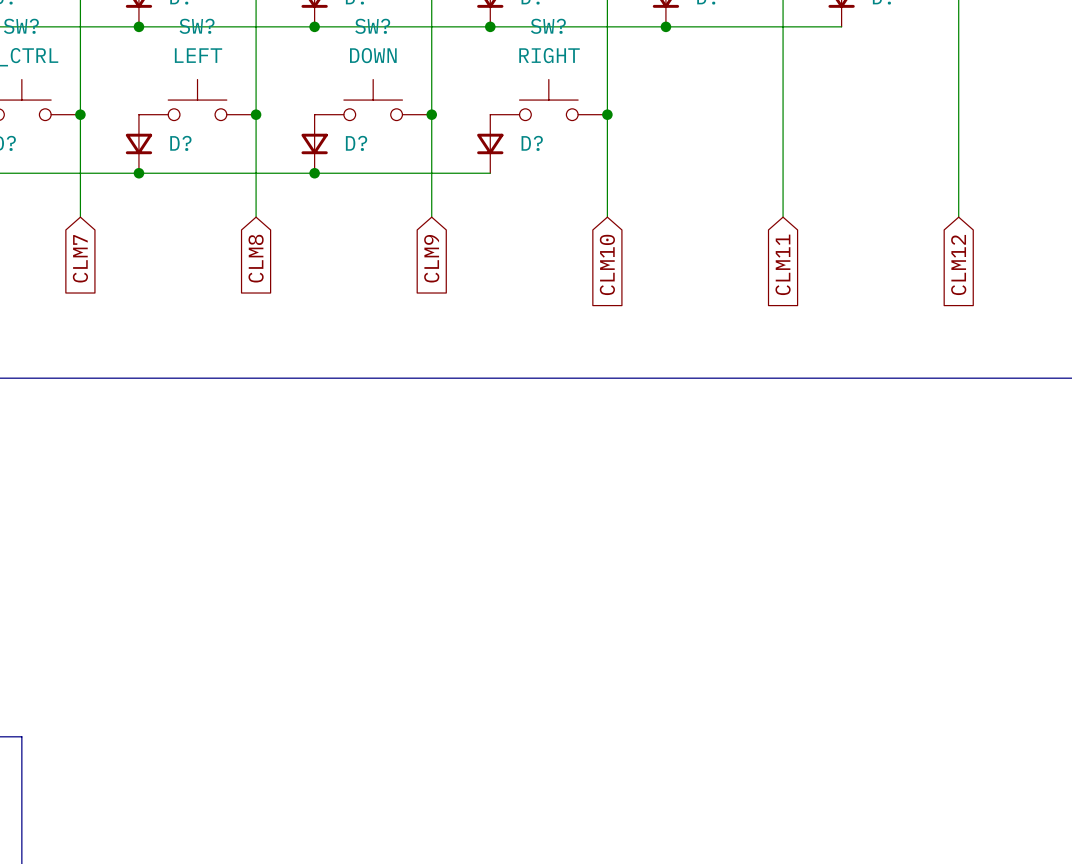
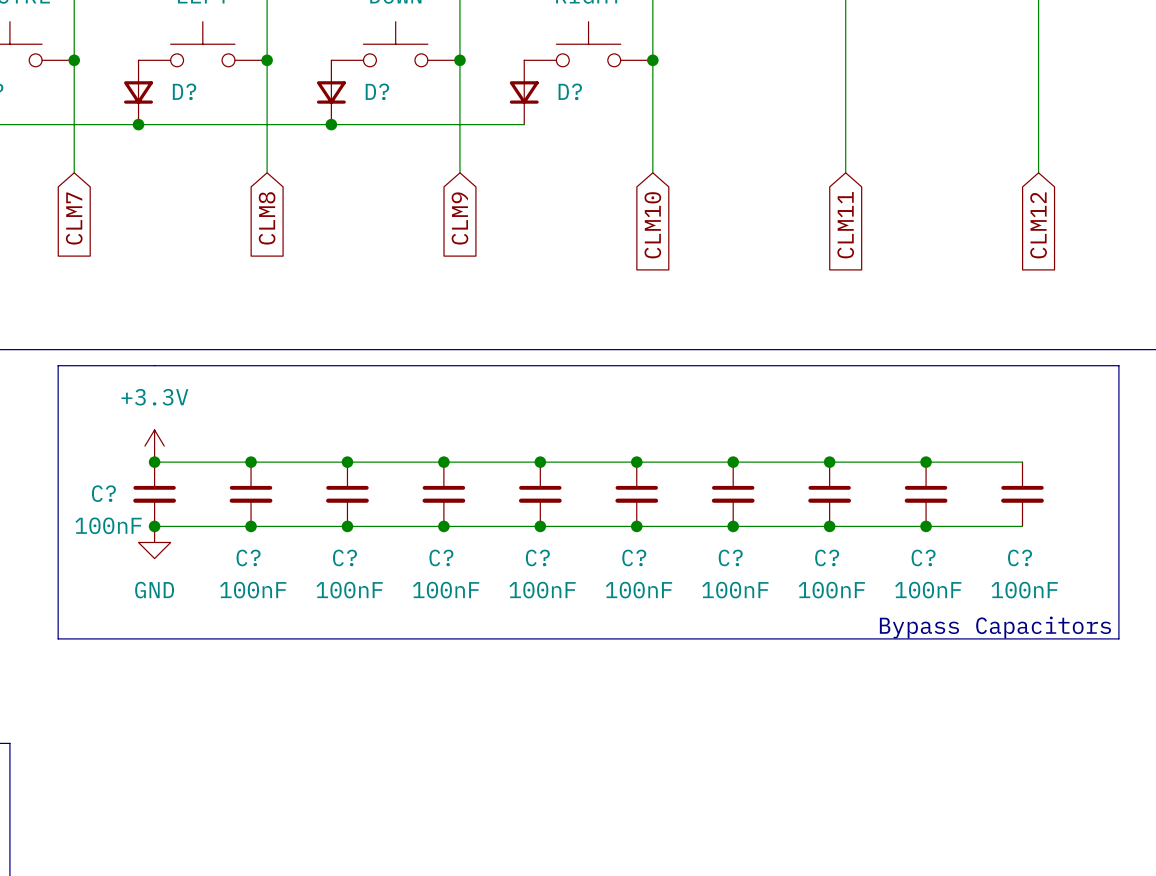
line: none -> (58, 365) (58, 638) (1118, 638) (1118, 365) (58, 365)
power symbol: none -> +3.3V (154, 446)
wire: none -> (154, 462) (1022, 462)
junction: none -> (154, 462)
junction: none -> (251, 462)
junction: none -> (347, 462)
junction: none -> (443, 462)
junction: none -> (540, 462)
junction: none -> (636, 462)
junction: none -> (733, 462)
junction: none -> (829, 462)
junction: none -> (926, 462)
C?: none -> 100nF (154, 494)
C?: none -> 100nF (251, 494)
C?: none -> 100nF (347, 494)
C?: none -> 100nF (443, 494)
C?: none -> 100nF (540, 494)
C?: none -> 100nF (636, 494)
C?: none -> 100nF (733, 494)
C?: none -> 100nF (829, 494)
C?: none -> 100nF (926, 494)
C?: none -> 100nF (1022, 494)
wire: none -> (154, 526) (1022, 526)
junction: none -> (154, 526)
junction: none -> (251, 526)
junction: none -> (347, 526)
junction: none -> (443, 526)
junction: none -> (540, 526)
junction: none -> (636, 526)
junction: none -> (733, 526)
junction: none -> (829, 526)
junction: none -> (926, 526)
power symbol: none -> GND (154, 542)
text: none -> Bypass Capacitors (995, 627)

